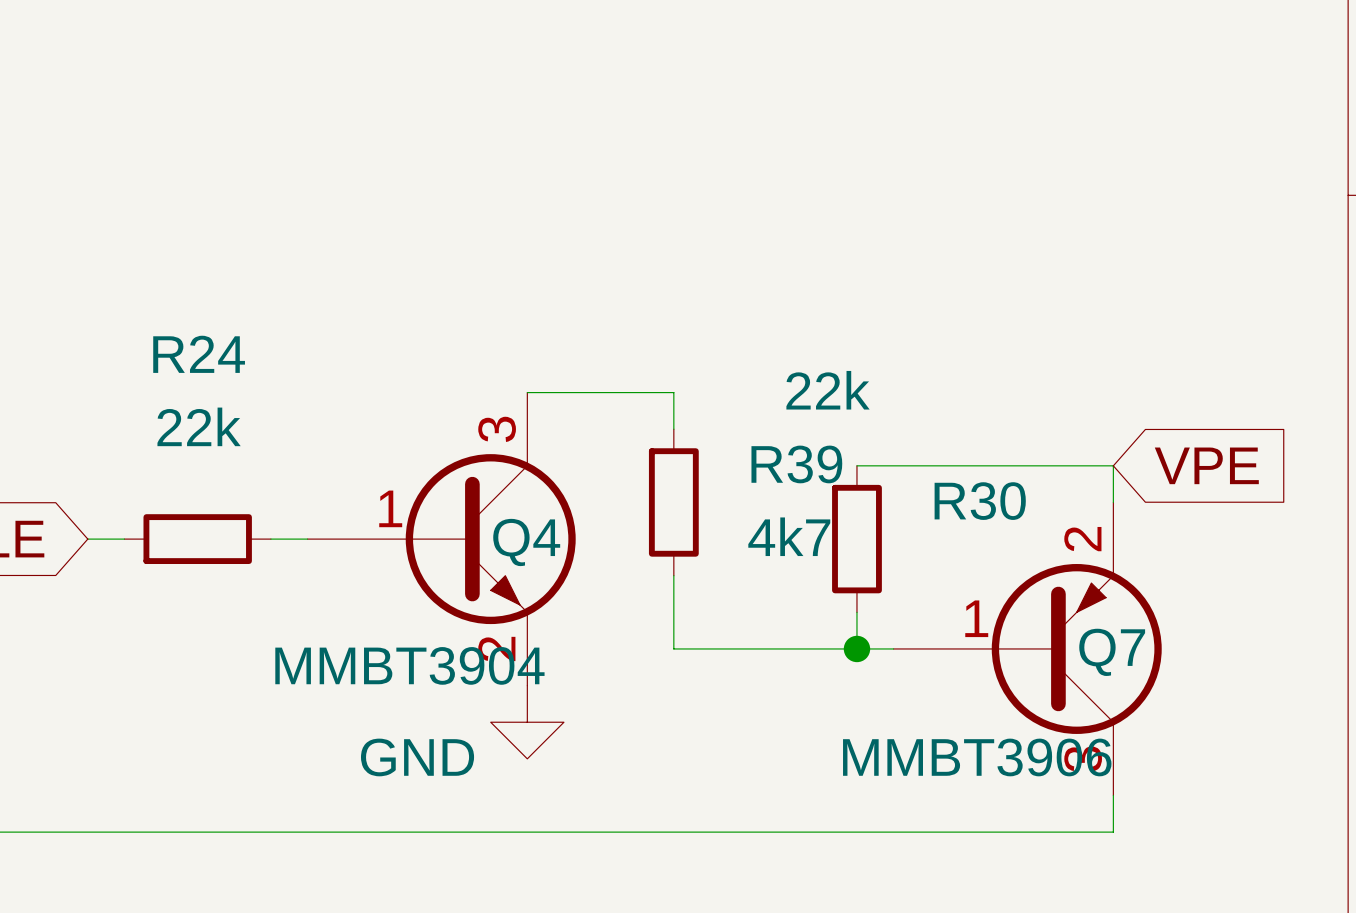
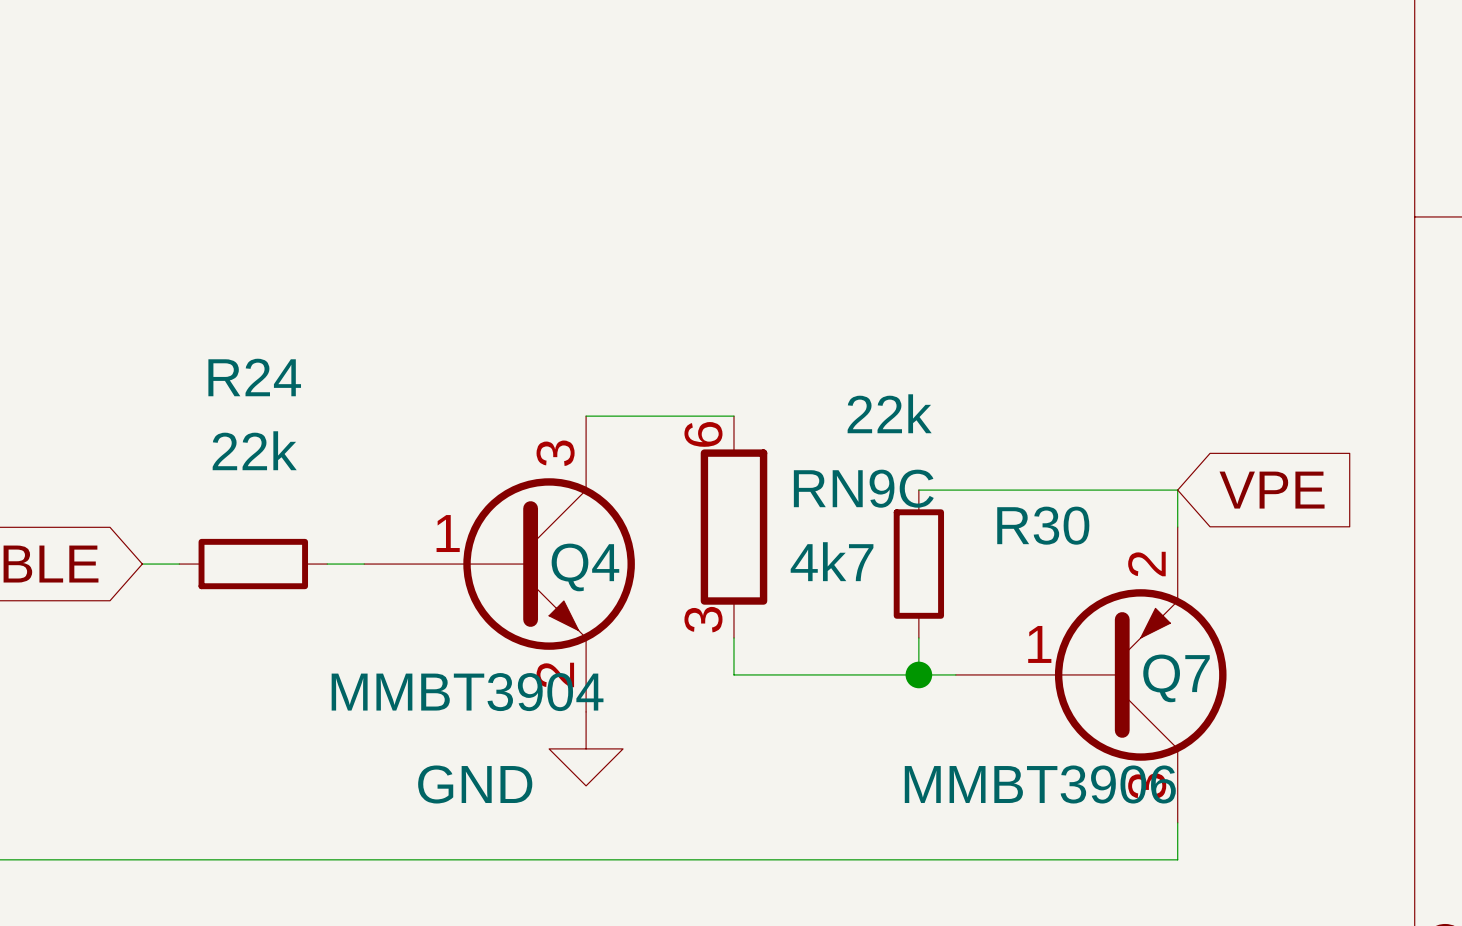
R39: 4k7 (673, 502) -> none
RN9C: none -> 4k7 (733, 527)

